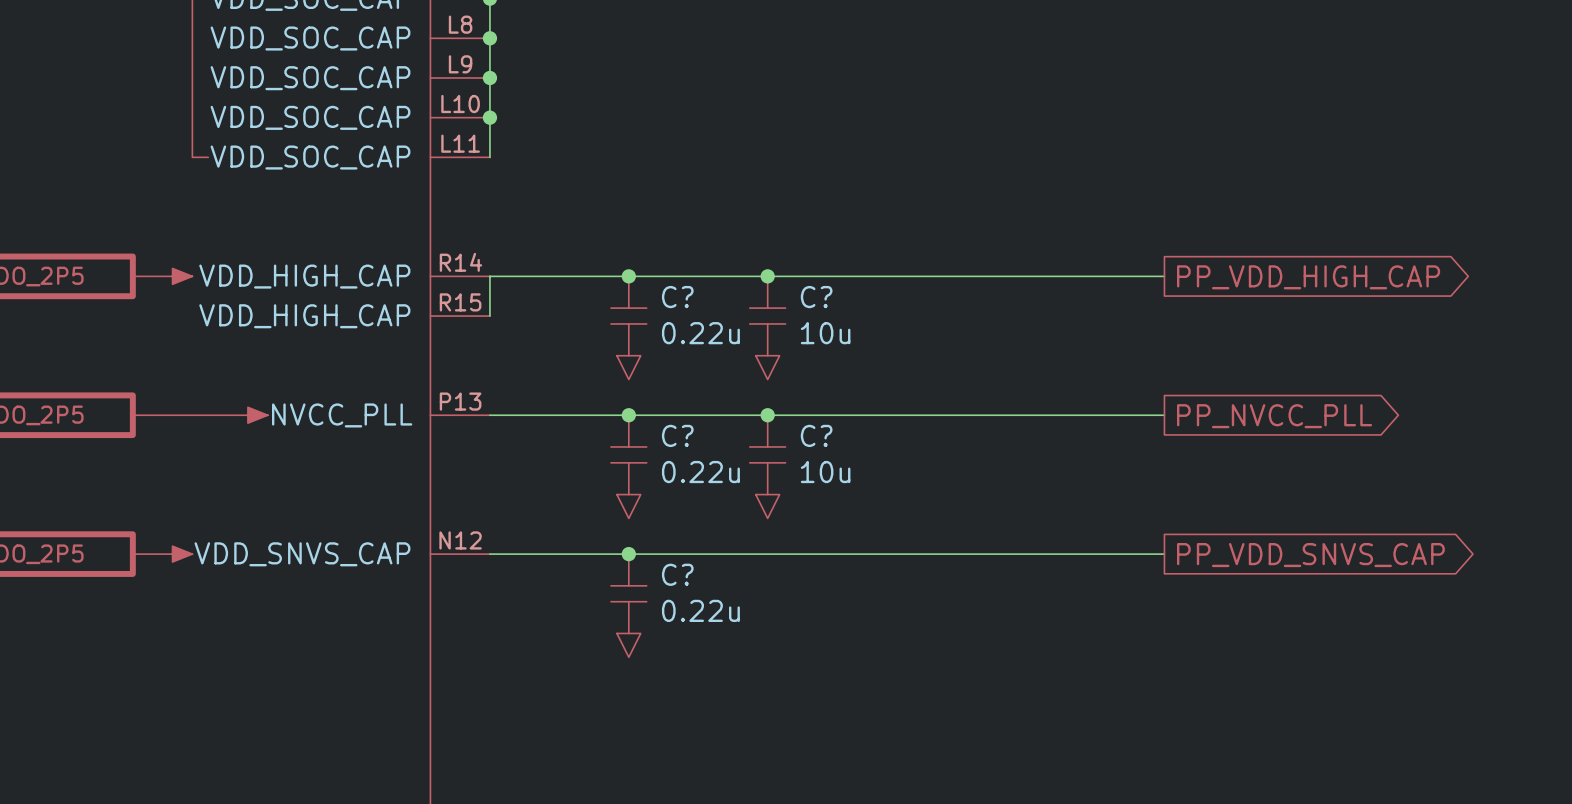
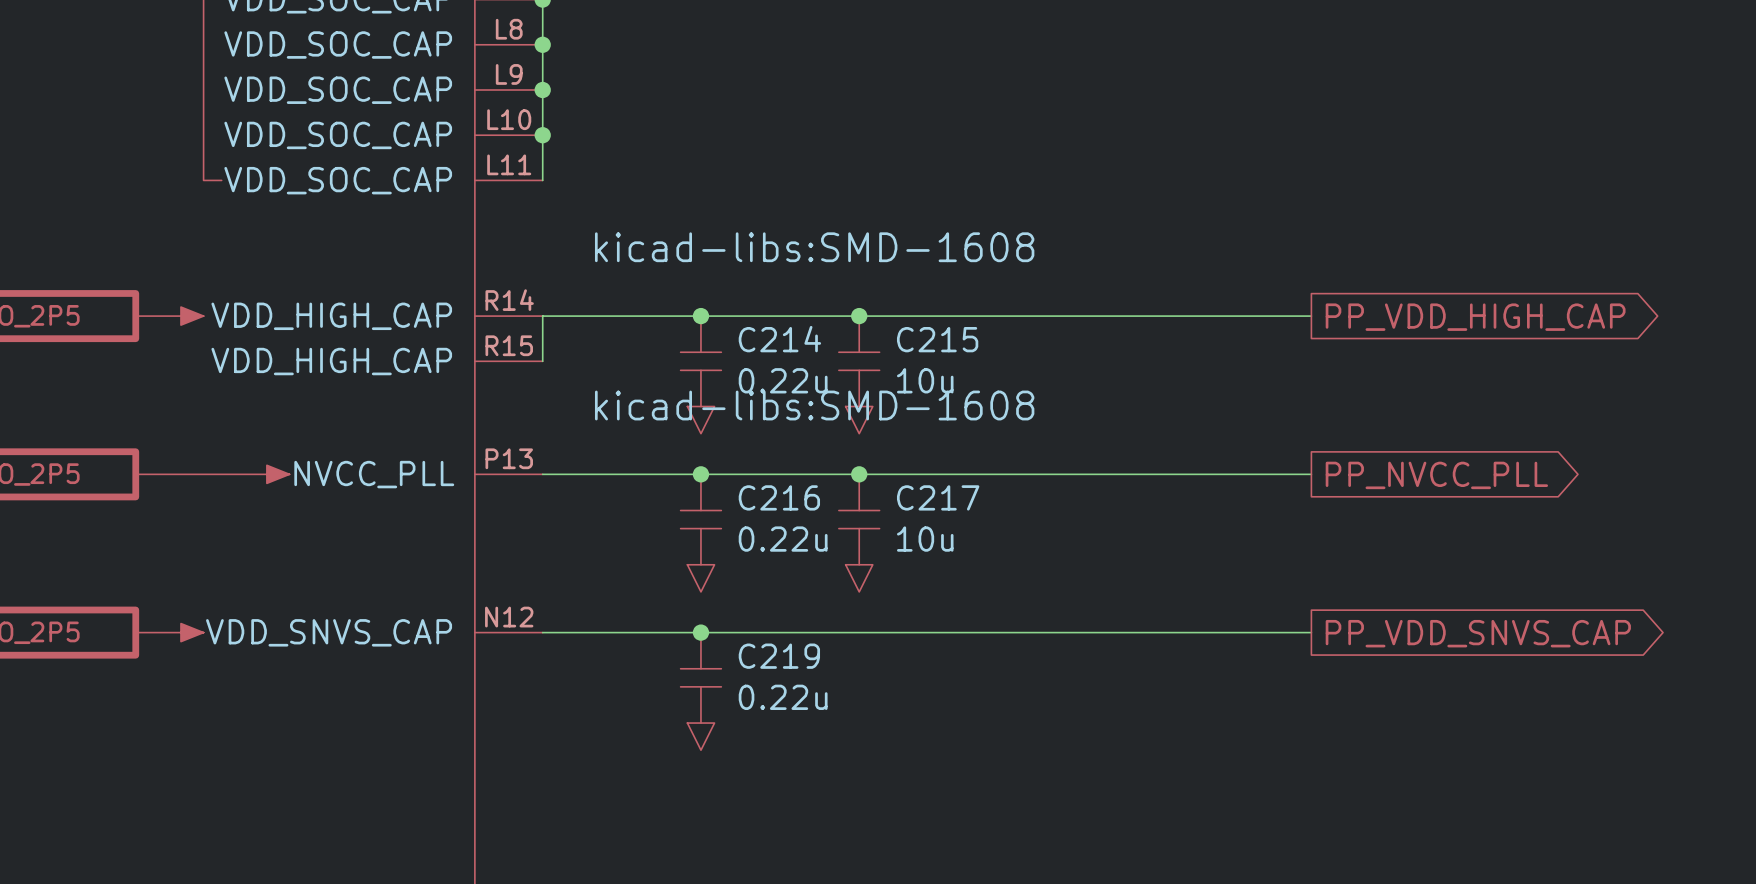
C? text: none -> kicad-libs:SMD-1608 (814, 247)
C? name: C? (677, 297) -> C214 (779, 339)
C? name: C? (816, 297) -> C215 (937, 339)
C? text: none -> kicad-libs:SMD-1608 (814, 405)
C? name: C? (677, 435) -> C216 (779, 497)
C? name: C? (816, 435) -> C217 (938, 497)
C? name: C? (677, 574) -> C219 (779, 656)

